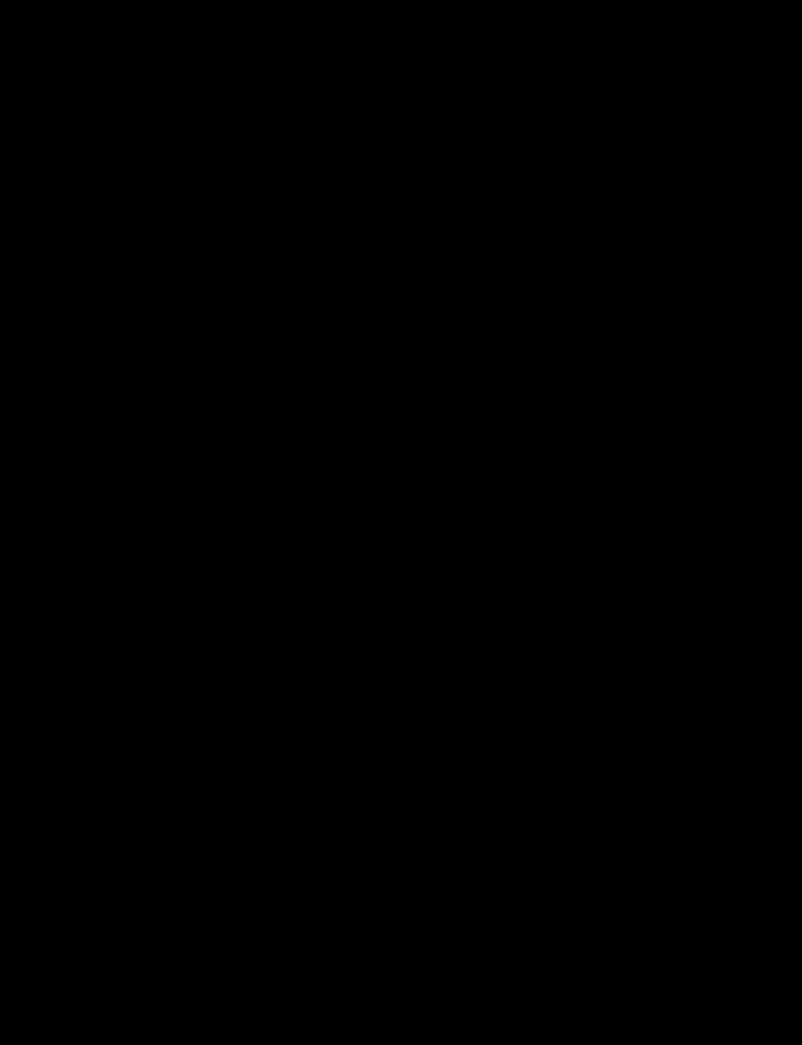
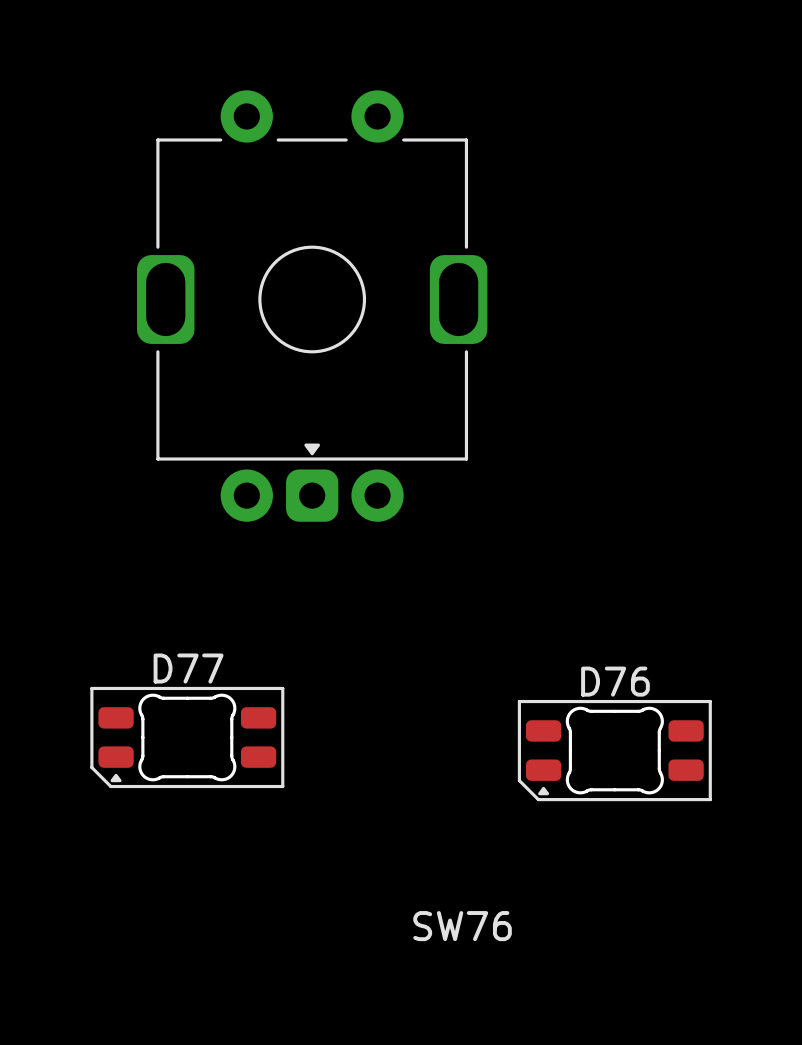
SW76: none -> (312, 306)
D77: none -> (187, 737)
D76: none -> (614, 750)

